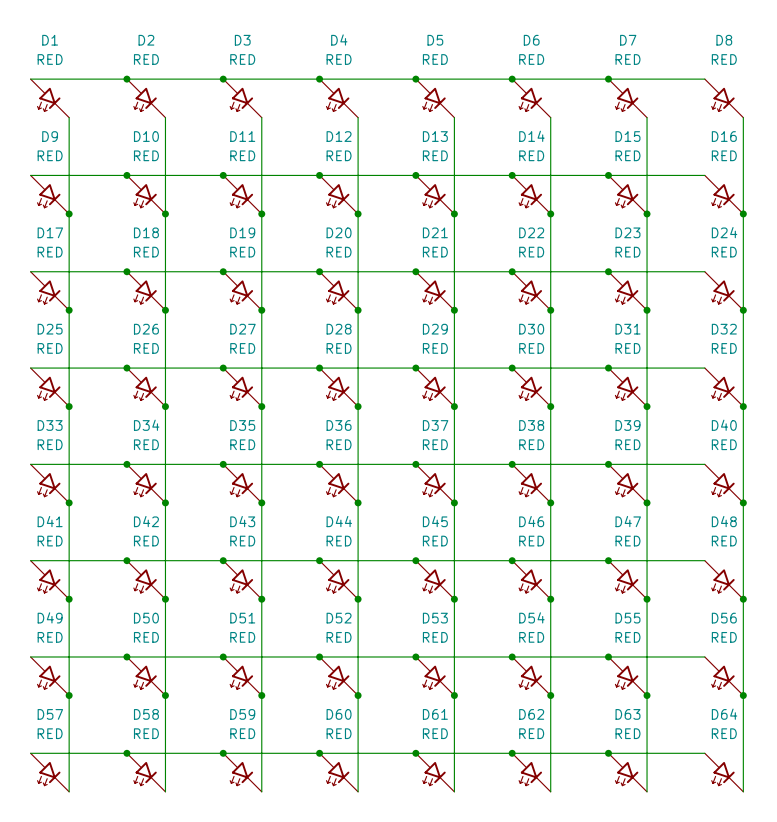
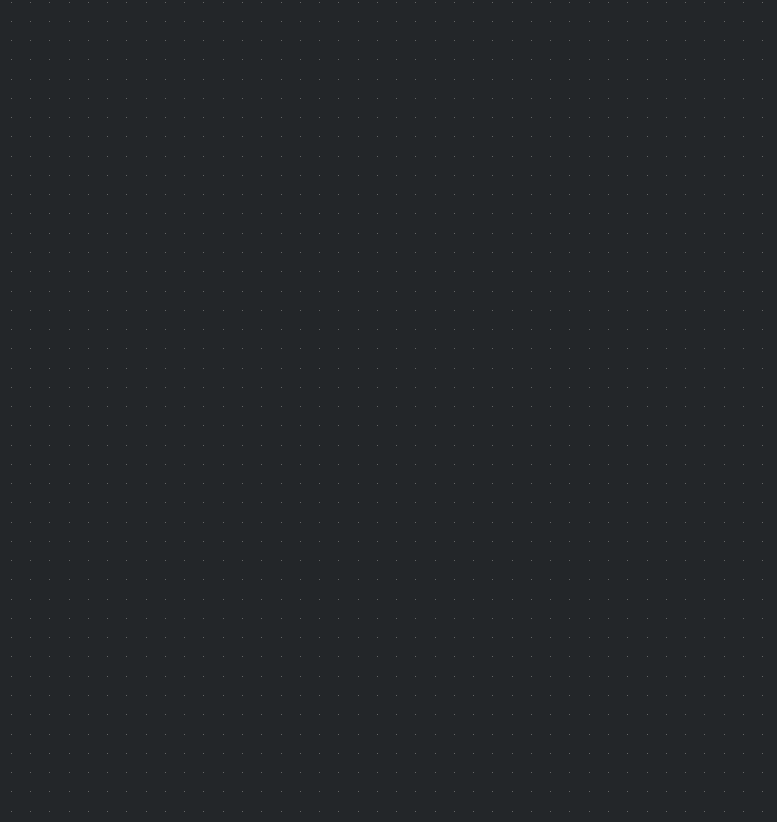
wire: (30, 79) (704, 79) -> none
junction: (126, 79) -> none
junction: (223, 79) -> none
junction: (319, 79) -> none
junction: (415, 79) -> none
junction: (512, 79) -> none
junction: (608, 79) -> none
D1: RED (49, 98) -> none
D2: RED (146, 98) -> none
D3: RED (242, 98) -> none
D4: RED (338, 98) -> none
D5: RED (435, 98) -> none
D6: RED (531, 98) -> none
D7: RED (627, 98) -> none
D8: RED (724, 98) -> none
wire: (69, 117) (69, 791) -> none
wire: (165, 117) (165, 791) -> none
wire: (261, 117) (261, 791) -> none
wire: (358, 117) (358, 791) -> none
wire: (454, 117) (454, 791) -> none
wire: (550, 117) (550, 791) -> none
wire: (647, 117) (647, 791) -> none
wire: (743, 117) (743, 791) -> none
wire: (30, 175) (704, 175) -> none
junction: (126, 175) -> none
junction: (223, 175) -> none
junction: (319, 175) -> none
junction: (415, 175) -> none
junction: (512, 175) -> none
junction: (608, 175) -> none
D9: RED (49, 194) -> none
D10: RED (146, 194) -> none
D11: RED (242, 194) -> none
D12: RED (338, 194) -> none
D13: RED (435, 194) -> none
D14: RED (531, 194) -> none
D15: RED (627, 194) -> none
D16: RED (724, 194) -> none
junction: (69, 213) -> none
junction: (165, 213) -> none
junction: (261, 213) -> none
junction: (358, 213) -> none
junction: (454, 213) -> none
junction: (550, 213) -> none
junction: (647, 213) -> none
junction: (743, 213) -> none
wire: (30, 271) (704, 271) -> none
junction: (126, 271) -> none
junction: (223, 271) -> none
junction: (319, 271) -> none
junction: (415, 271) -> none
junction: (512, 271) -> none
junction: (608, 271) -> none
D17: RED (49, 291) -> none
D18: RED (146, 291) -> none
D19: RED (242, 291) -> none
D20: RED (338, 291) -> none
D21: RED (435, 291) -> none
D22: RED (531, 291) -> none
D23: RED (627, 291) -> none
D24: RED (724, 291) -> none
junction: (69, 310) -> none
junction: (165, 310) -> none
junction: (261, 310) -> none
junction: (358, 310) -> none
junction: (454, 310) -> none
junction: (550, 310) -> none
junction: (647, 310) -> none
junction: (743, 310) -> none
wire: (30, 368) (704, 368) -> none
junction: (126, 368) -> none
junction: (223, 368) -> none
junction: (319, 368) -> none
junction: (415, 368) -> none
junction: (512, 368) -> none
junction: (608, 368) -> none
D25: RED (49, 387) -> none
D26: RED (146, 387) -> none
D27: RED (242, 387) -> none
D28: RED (338, 387) -> none
D29: RED (435, 387) -> none
D30: RED (531, 387) -> none
D31: RED (627, 387) -> none
D32: RED (724, 387) -> none
junction: (69, 406) -> none
junction: (165, 406) -> none
junction: (261, 406) -> none
junction: (358, 406) -> none
junction: (454, 406) -> none
junction: (550, 406) -> none
junction: (647, 406) -> none
junction: (743, 406) -> none
wire: (30, 464) (704, 464) -> none
junction: (126, 464) -> none
junction: (223, 464) -> none
junction: (319, 464) -> none
junction: (415, 464) -> none
junction: (512, 464) -> none
junction: (608, 464) -> none
D33: RED (49, 483) -> none
D34: RED (146, 483) -> none
D35: RED (242, 483) -> none
D36: RED (338, 483) -> none
D37: RED (435, 483) -> none
D38: RED (531, 483) -> none
D39: RED (627, 483) -> none
D40: RED (724, 483) -> none
junction: (69, 502) -> none
junction: (165, 502) -> none
junction: (261, 502) -> none
junction: (358, 502) -> none
junction: (454, 502) -> none
junction: (550, 502) -> none
junction: (647, 502) -> none
junction: (743, 502) -> none
wire: (30, 560) (704, 560) -> none
junction: (126, 560) -> none
junction: (223, 560) -> none
junction: (319, 560) -> none
junction: (415, 560) -> none
junction: (512, 560) -> none
junction: (608, 560) -> none
D41: RED (49, 579) -> none
D42: RED (146, 579) -> none
D43: RED (242, 579) -> none
D44: RED (338, 579) -> none
D45: RED (435, 579) -> none
D46: RED (531, 579) -> none
D47: RED (627, 579) -> none
D48: RED (724, 579) -> none
junction: (69, 599) -> none
junction: (165, 599) -> none
junction: (261, 599) -> none
junction: (358, 599) -> none
junction: (454, 599) -> none
junction: (550, 599) -> none
junction: (647, 599) -> none
junction: (743, 599) -> none
wire: (30, 656) (704, 656) -> none
junction: (126, 656) -> none
junction: (223, 656) -> none
junction: (319, 656) -> none
junction: (415, 656) -> none
junction: (512, 656) -> none
junction: (608, 656) -> none
D49: RED (49, 676) -> none
D50: RED (146, 676) -> none
D51: RED (242, 676) -> none
D52: RED (338, 676) -> none
D53: RED (435, 676) -> none
D54: RED (531, 676) -> none
D55: RED (627, 676) -> none
D56: RED (724, 676) -> none
junction: (69, 695) -> none
junction: (165, 695) -> none
junction: (261, 695) -> none
junction: (358, 695) -> none
junction: (454, 695) -> none
junction: (550, 695) -> none
junction: (647, 695) -> none
junction: (743, 695) -> none
wire: (30, 753) (704, 753) -> none
junction: (126, 753) -> none
junction: (223, 753) -> none
junction: (319, 753) -> none
junction: (415, 753) -> none
junction: (512, 753) -> none
junction: (608, 753) -> none
D57: RED (49, 772) -> none
D58: RED (146, 772) -> none
D59: RED (242, 772) -> none
D60: RED (338, 772) -> none
D61: RED (435, 772) -> none
D62: RED (531, 772) -> none
D63: RED (627, 772) -> none
D64: RED (724, 772) -> none

